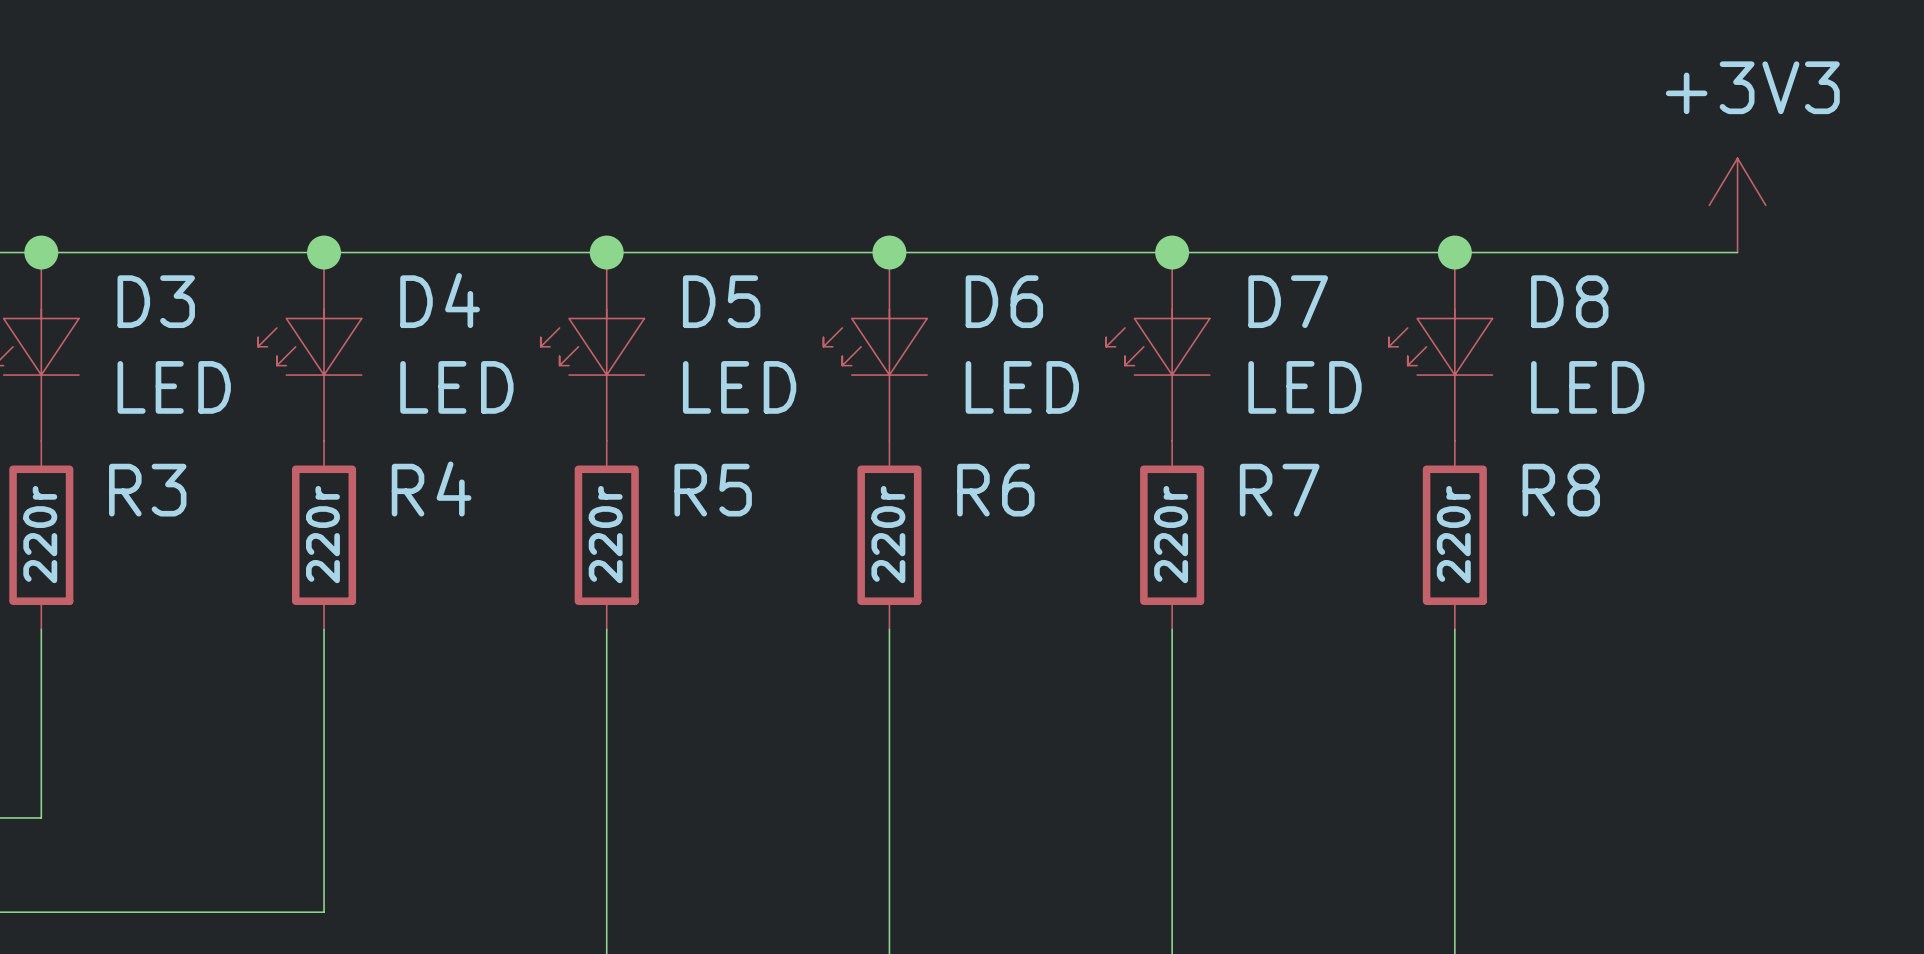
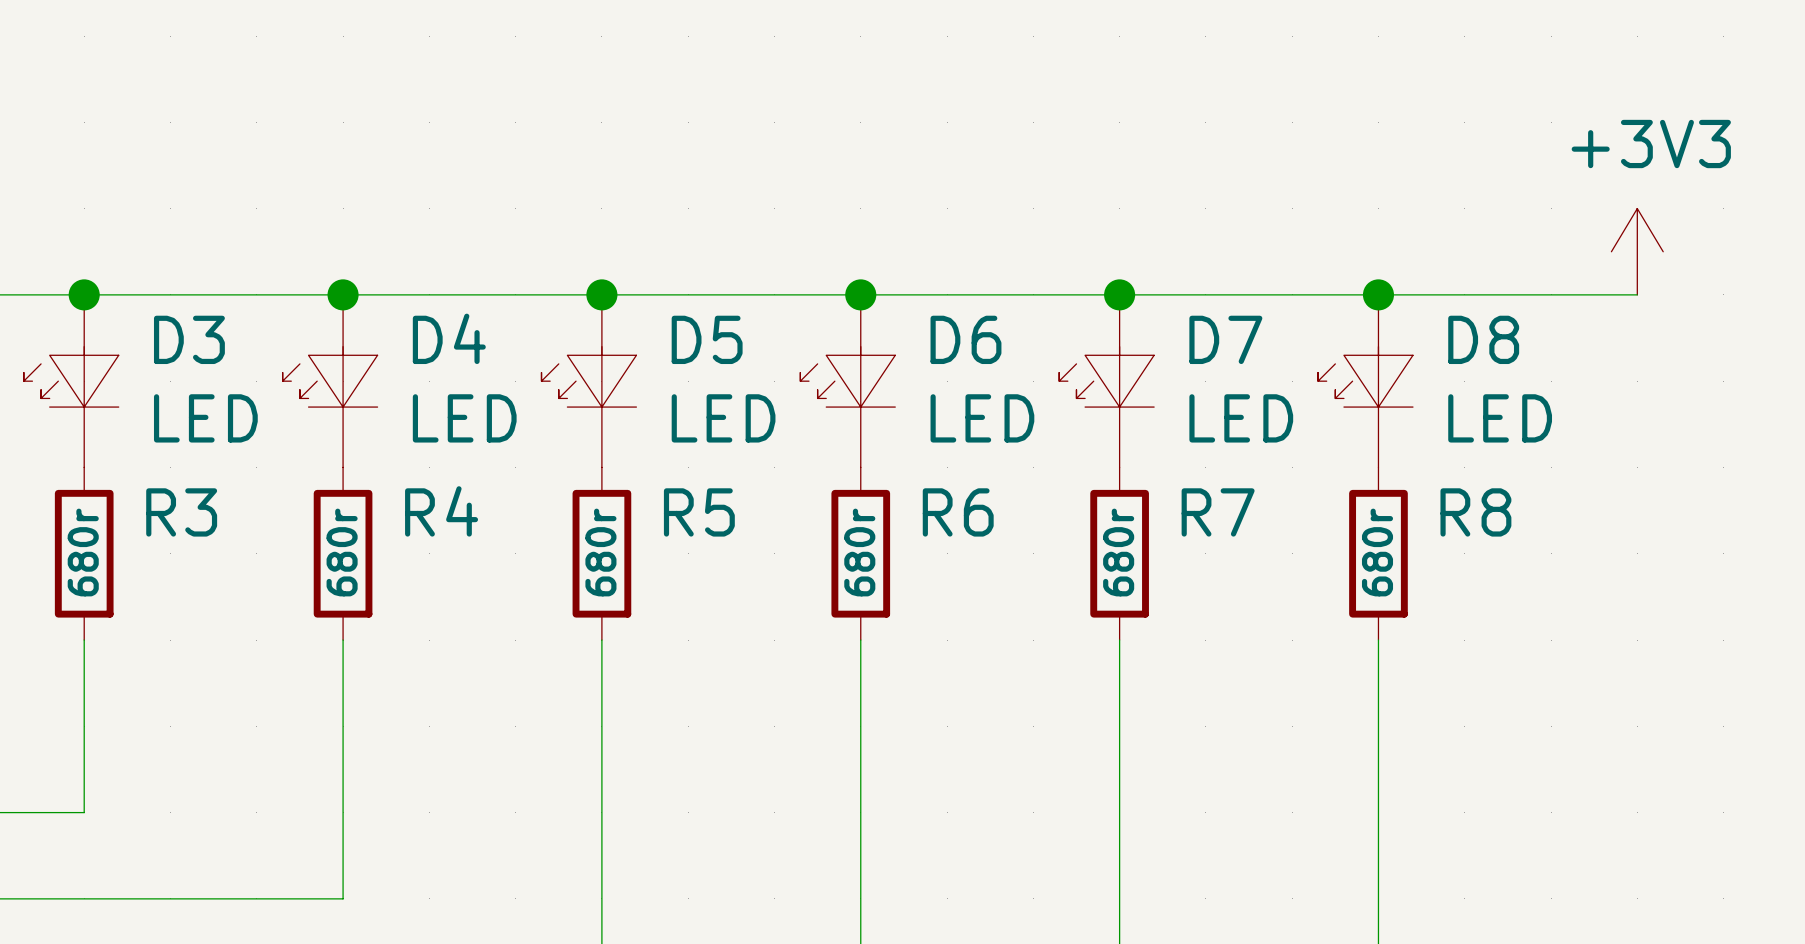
R3 value: 220r (40, 534) -> 680r (83, 552)
R4 value: 220r (322, 534) -> 680r (342, 552)
R5 value: 220r (605, 534) -> 680r (600, 552)
R6 value: 220r (888, 534) -> 680r (859, 552)
R7 value: 220r (1171, 534) -> 680r (1118, 552)
R8 value: 220r (1453, 534) -> 680r (1377, 552)

